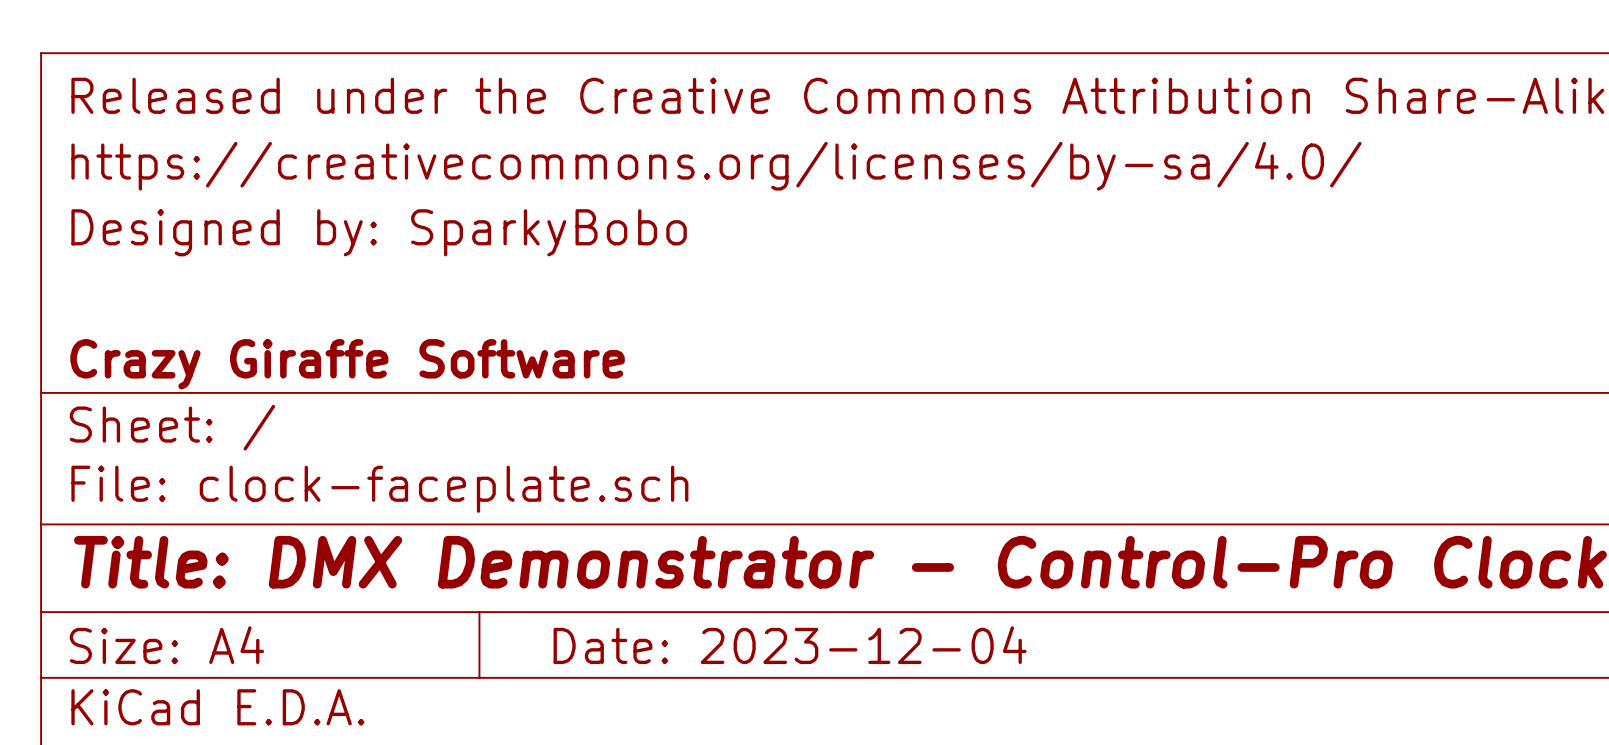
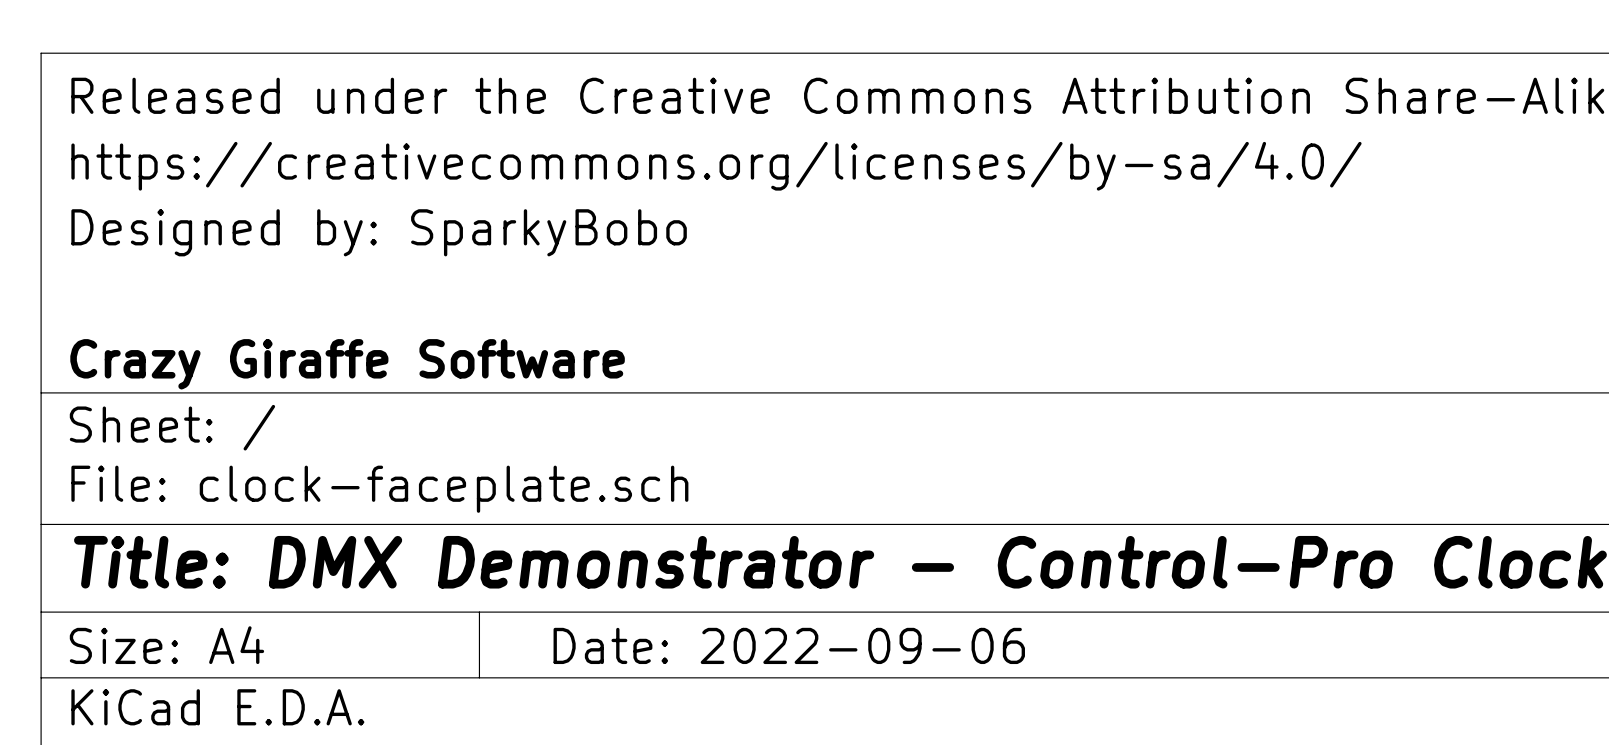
title block: Date: 2023-12-04 (790, 645) -> Date: 2022-09-06 (789, 645)

